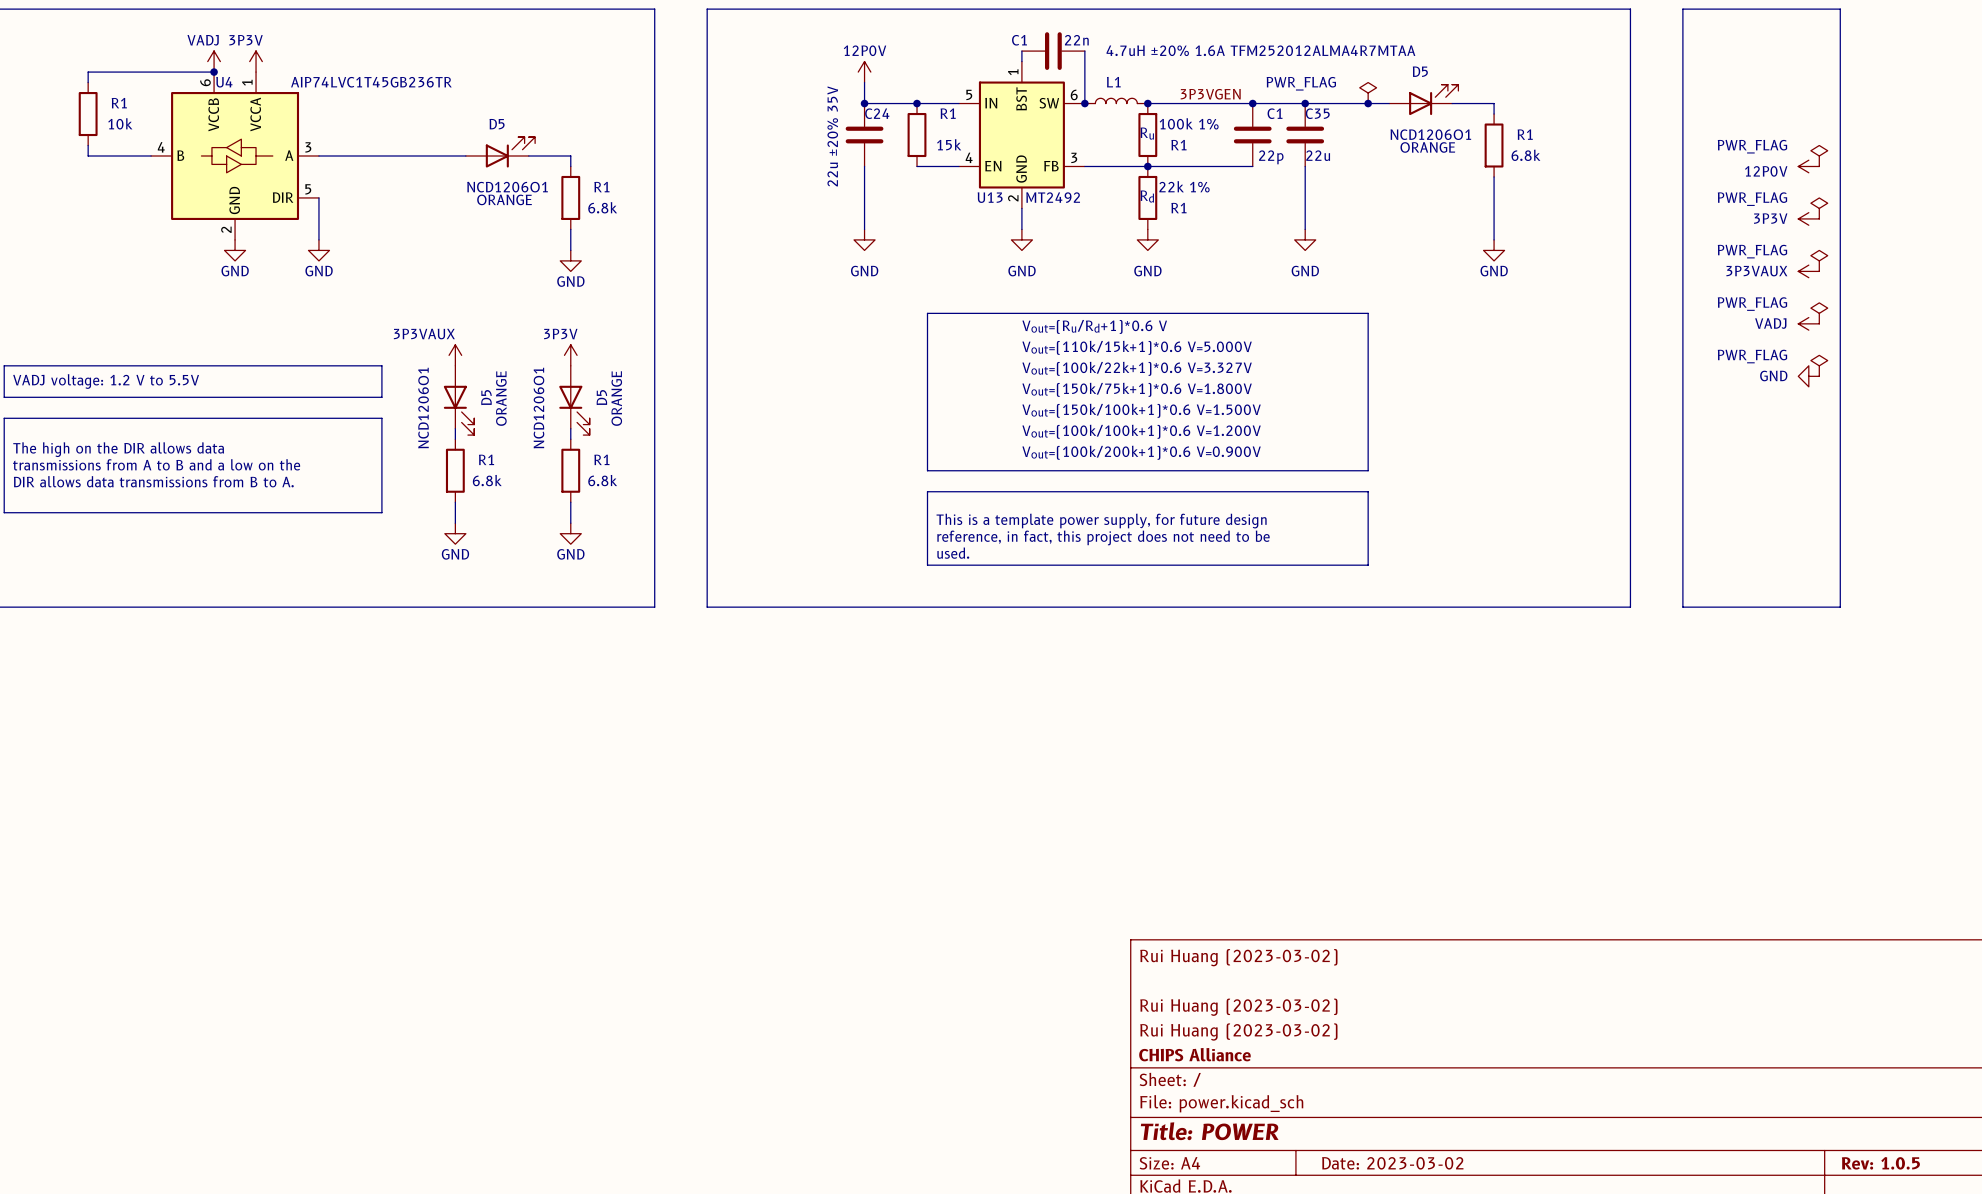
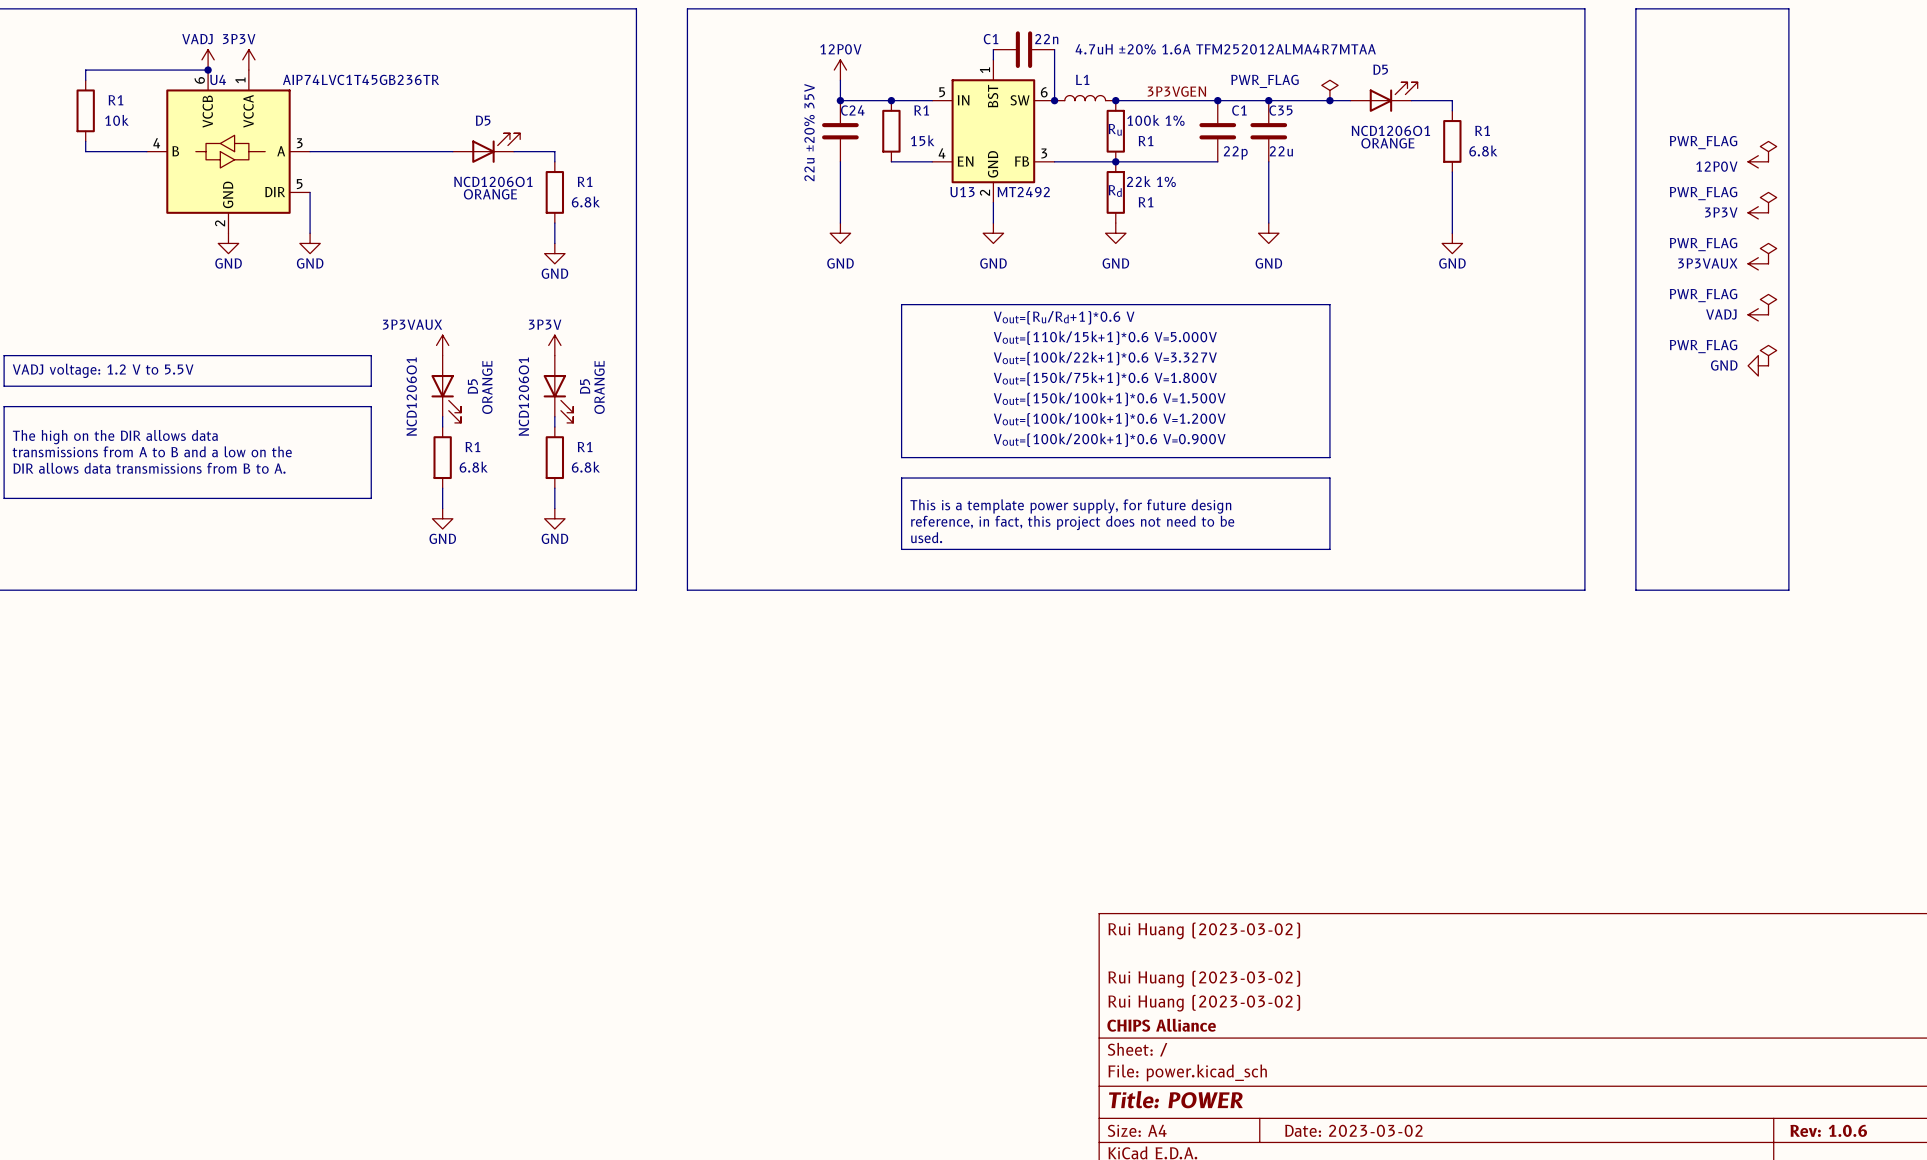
title block: Rev: 1.0.5 (1880, 1163) -> Rev: 1.0.6 (1828, 1130)

